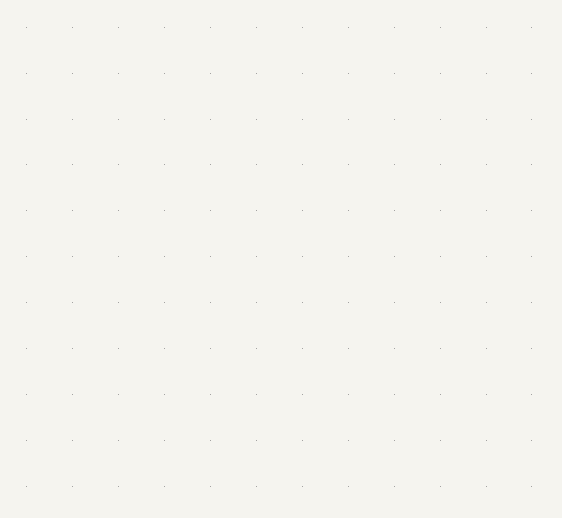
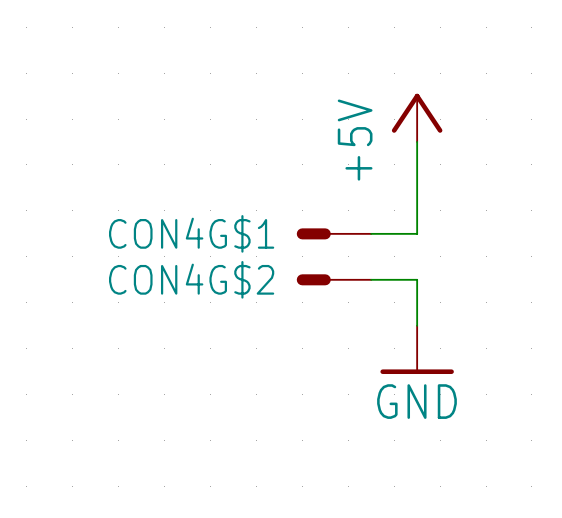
power symbol: none -> +5V (417, 117)
wire: none -> (417, 141) (417, 233) (371, 233)
CON4G$1: none -> (333, 233)
CON4G$2: none -> (333, 279)
wire: none -> (371, 279) (417, 279) (417, 325)
power symbol: none -> GND (417, 349)

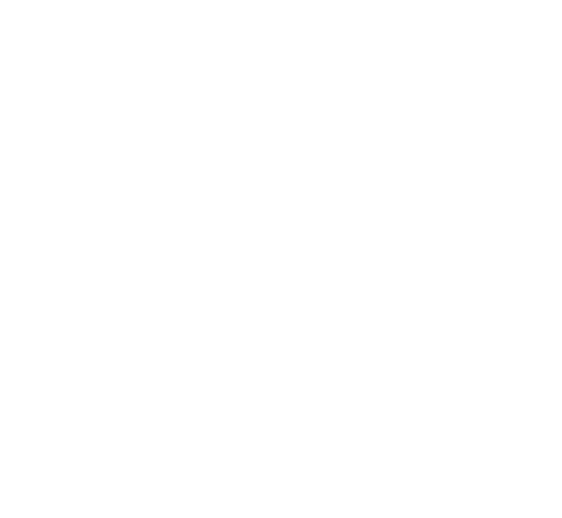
power symbol: +5V (417, 117) -> none
wire: (417, 141) (417, 233) (371, 233) -> none
CON4G$1: (333, 233) -> none
CON4G$2: (333, 279) -> none
wire: (371, 279) (417, 279) (417, 325) -> none
power symbol: GND (417, 349) -> none

